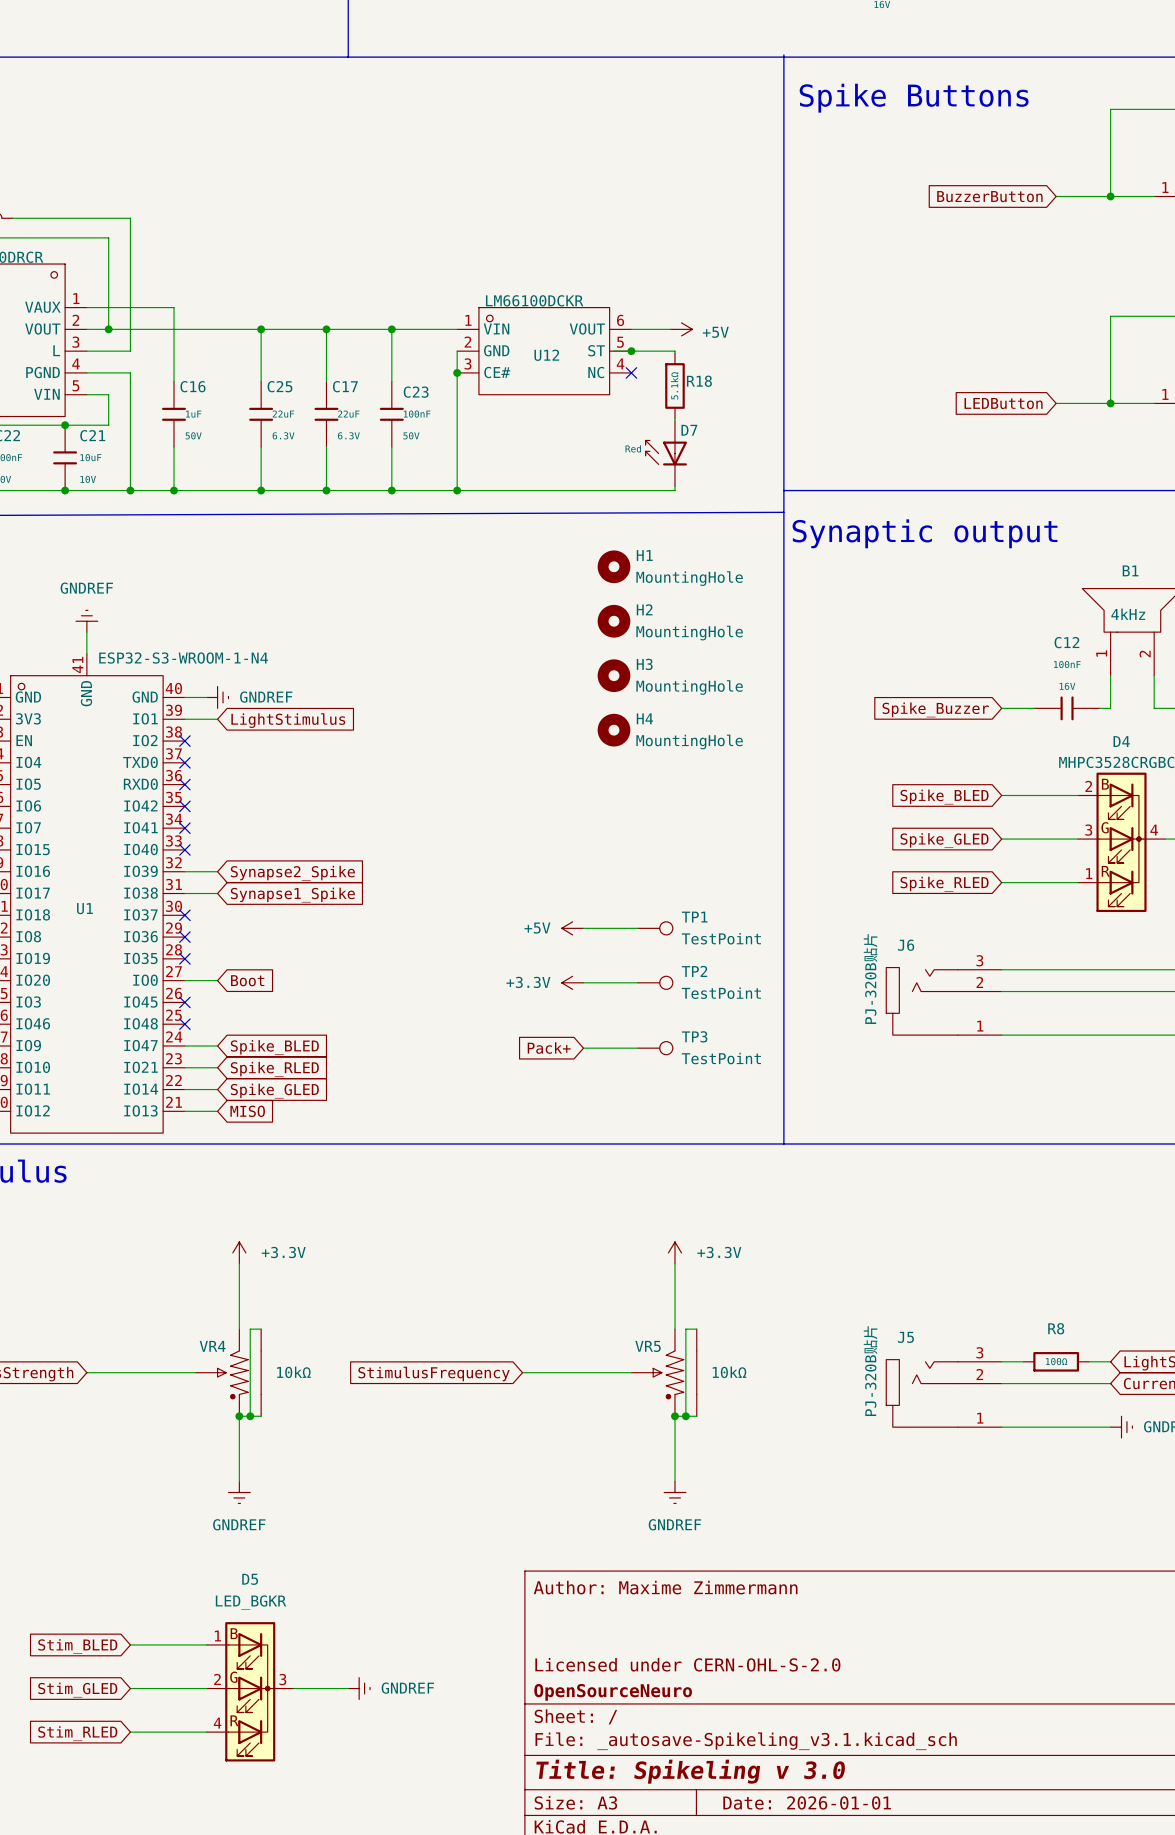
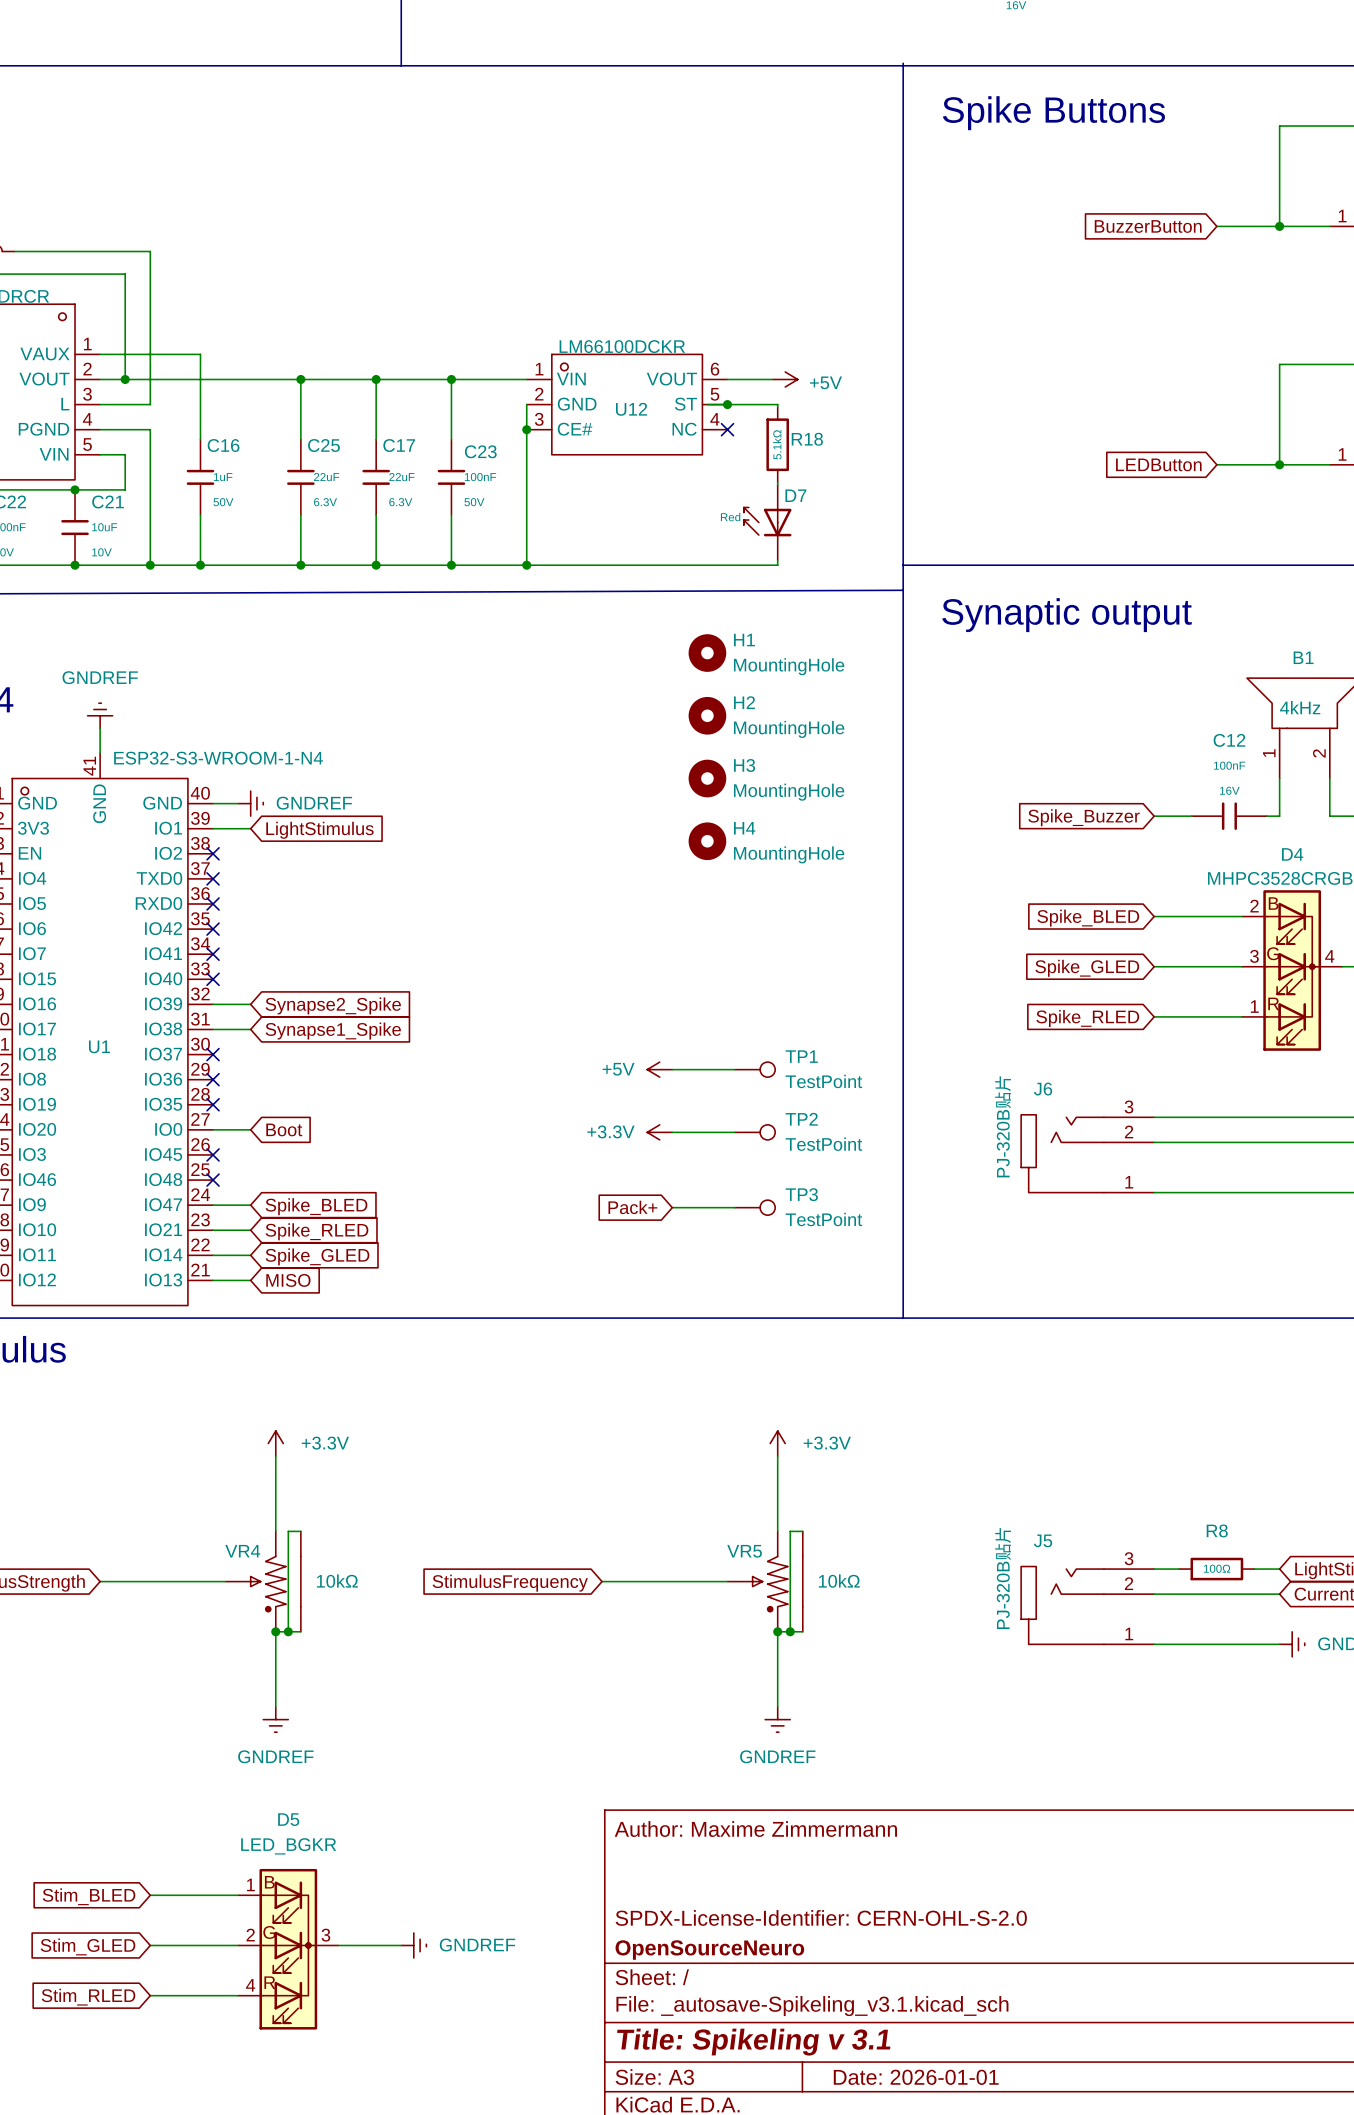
title block: Licensed under CERN-OHL-S-2.0 (687, 1664) -> SPDX-License-Identifier: CERN-OHL-S-2.0 (821, 1917)
title block: Title: Spikeling v 3.0 (690, 1771) -> Title: Spikeling v 3.1 (753, 2042)

